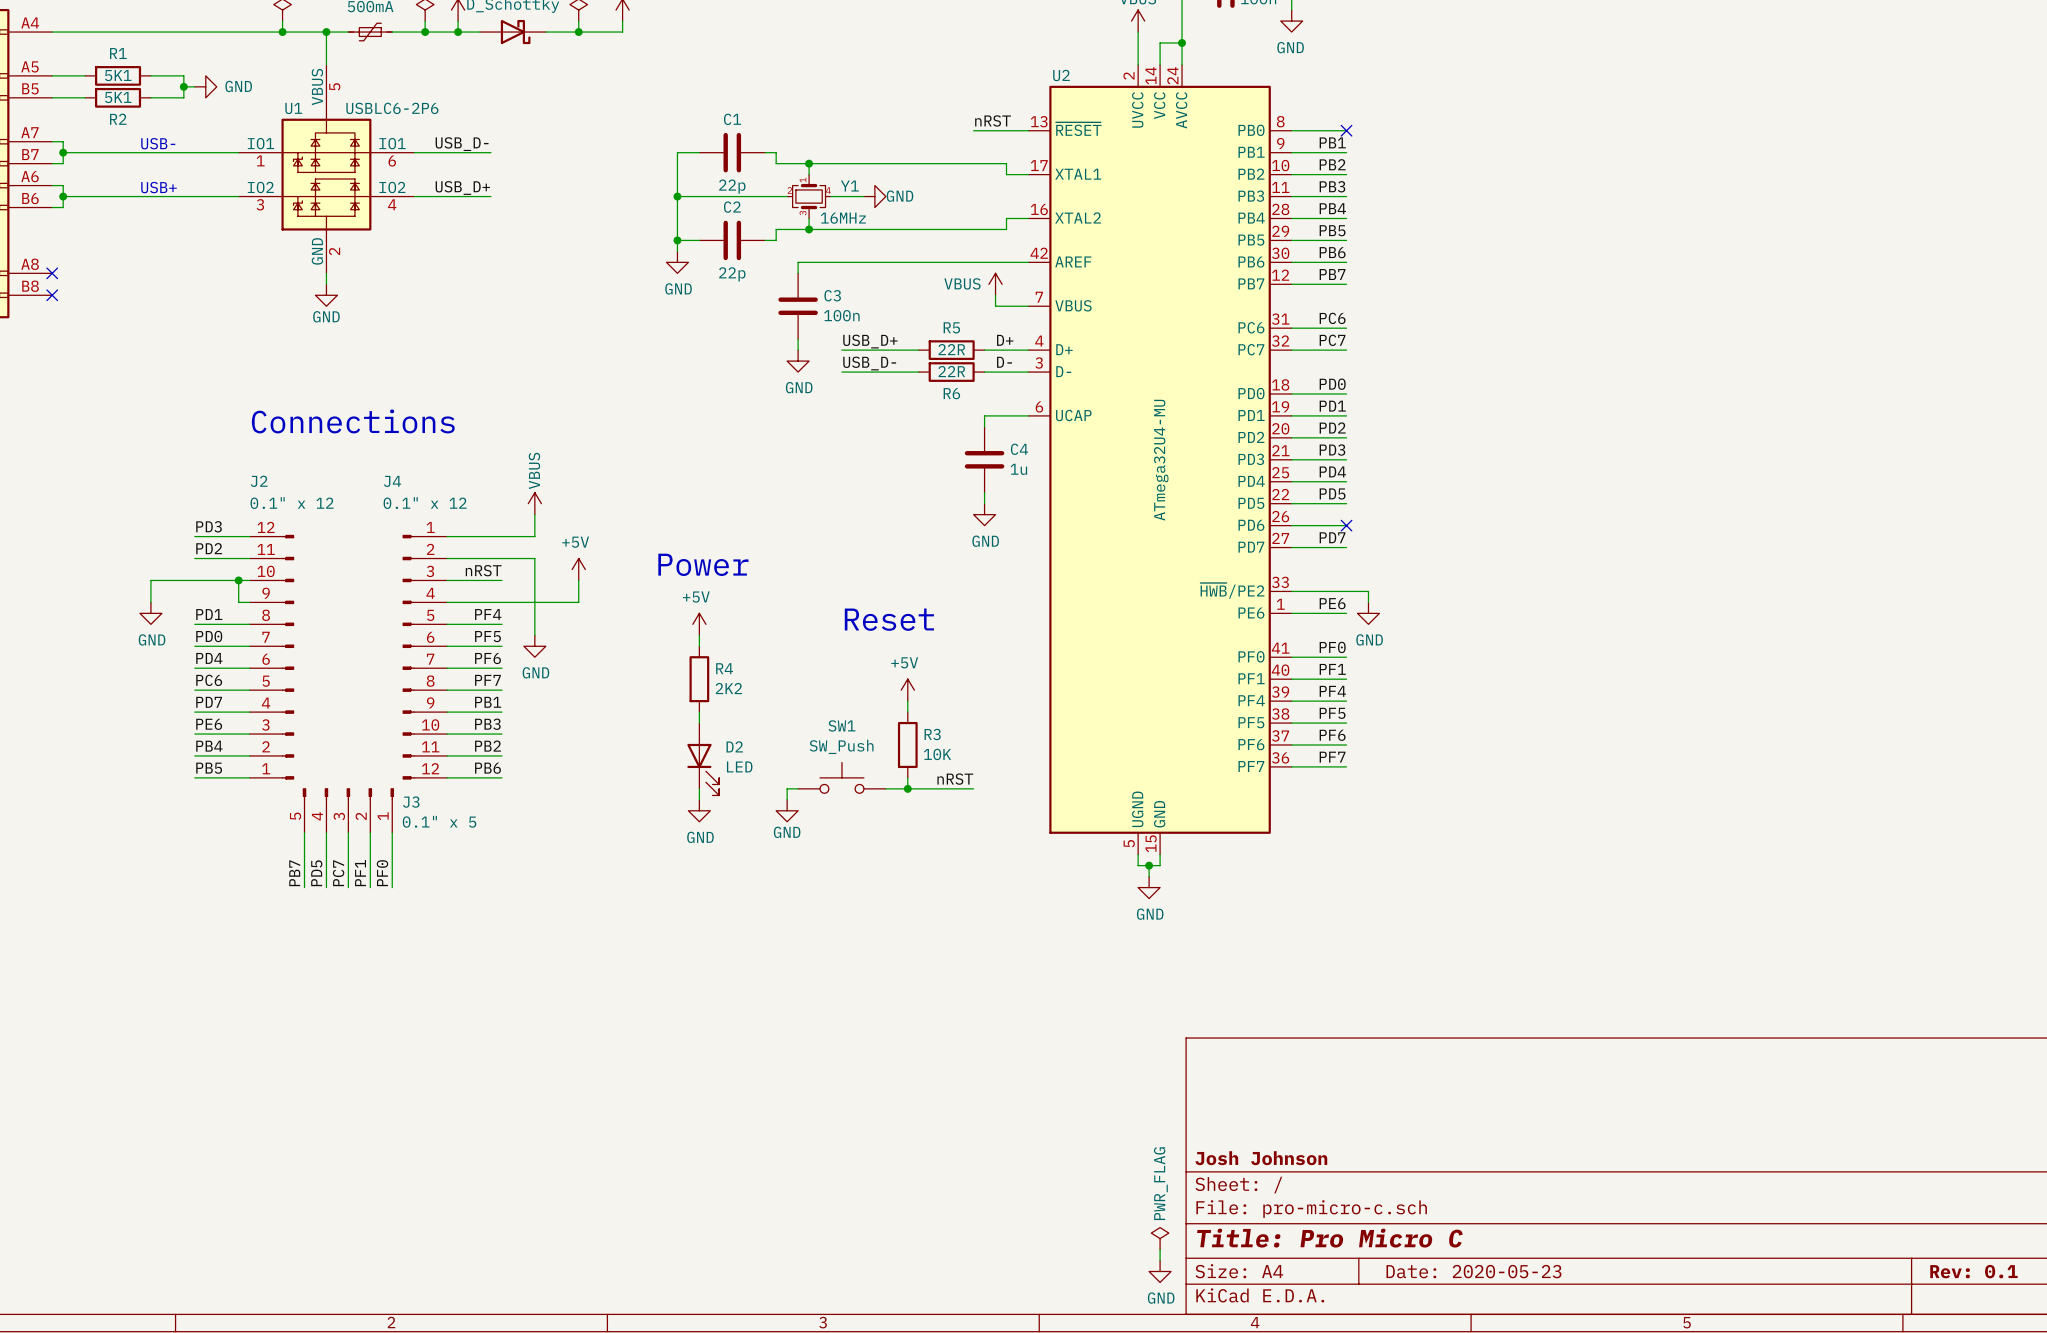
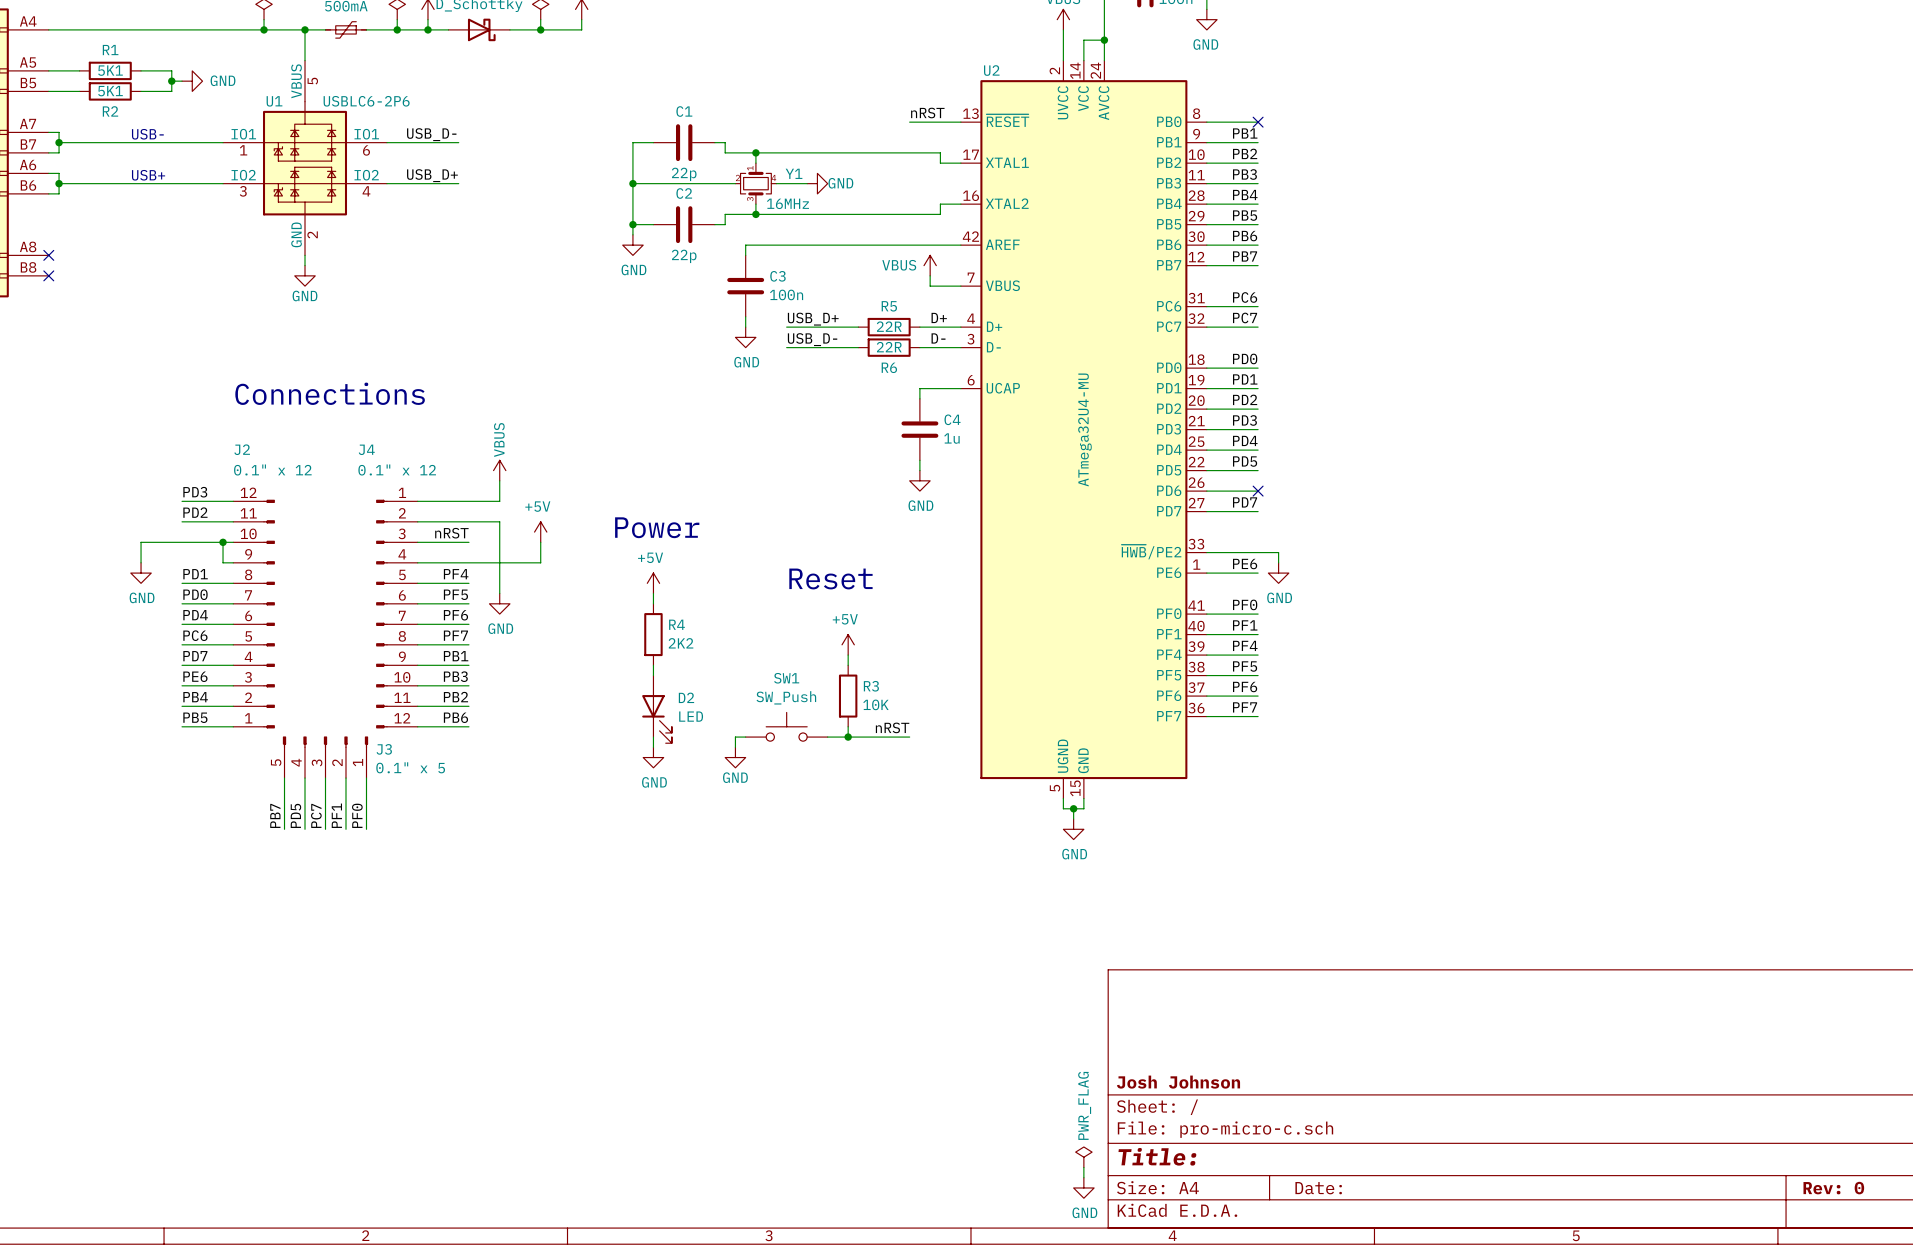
title block: Title: Pro Micro C (1329, 1238) -> Title: (1157, 1156)
title block: Date: 2020-05-23 (1473, 1271) -> Date: (1318, 1188)
title block: Rev: 0.1 (1973, 1271) -> Rev: 0 (1833, 1188)

